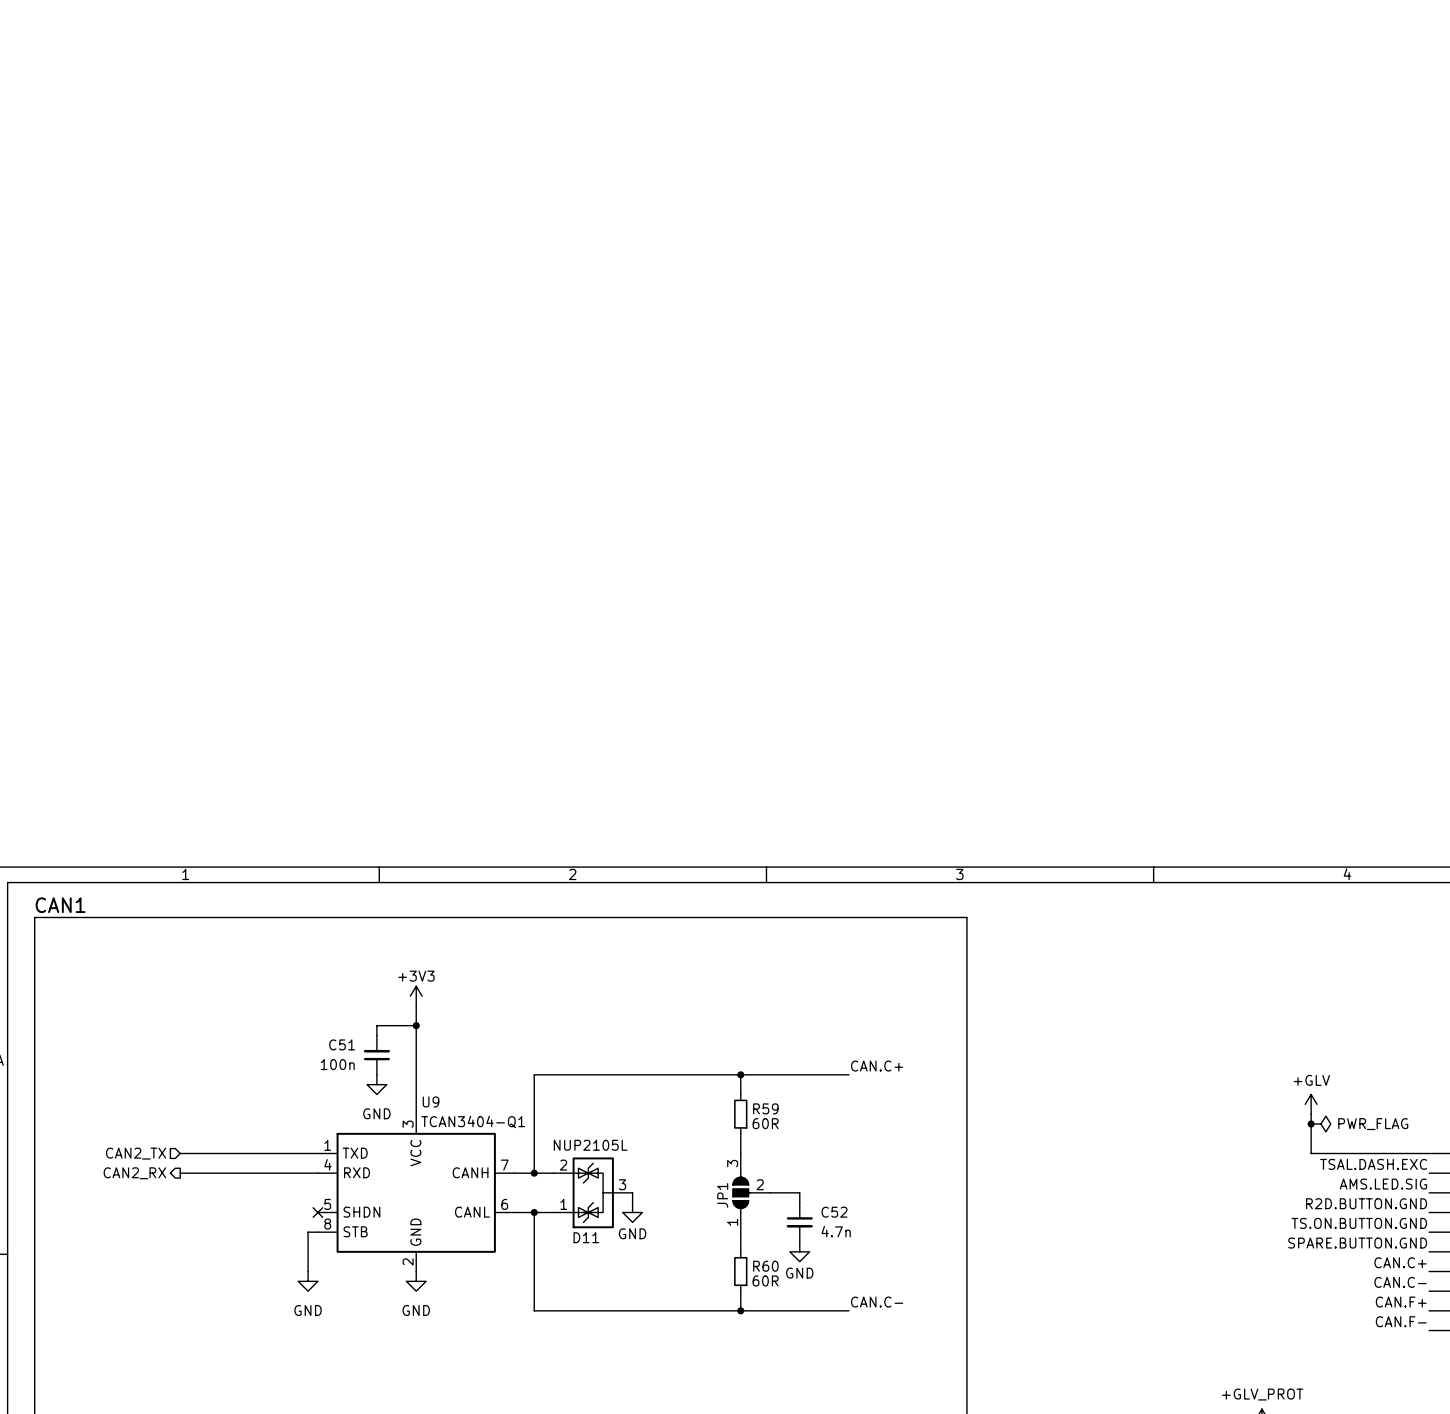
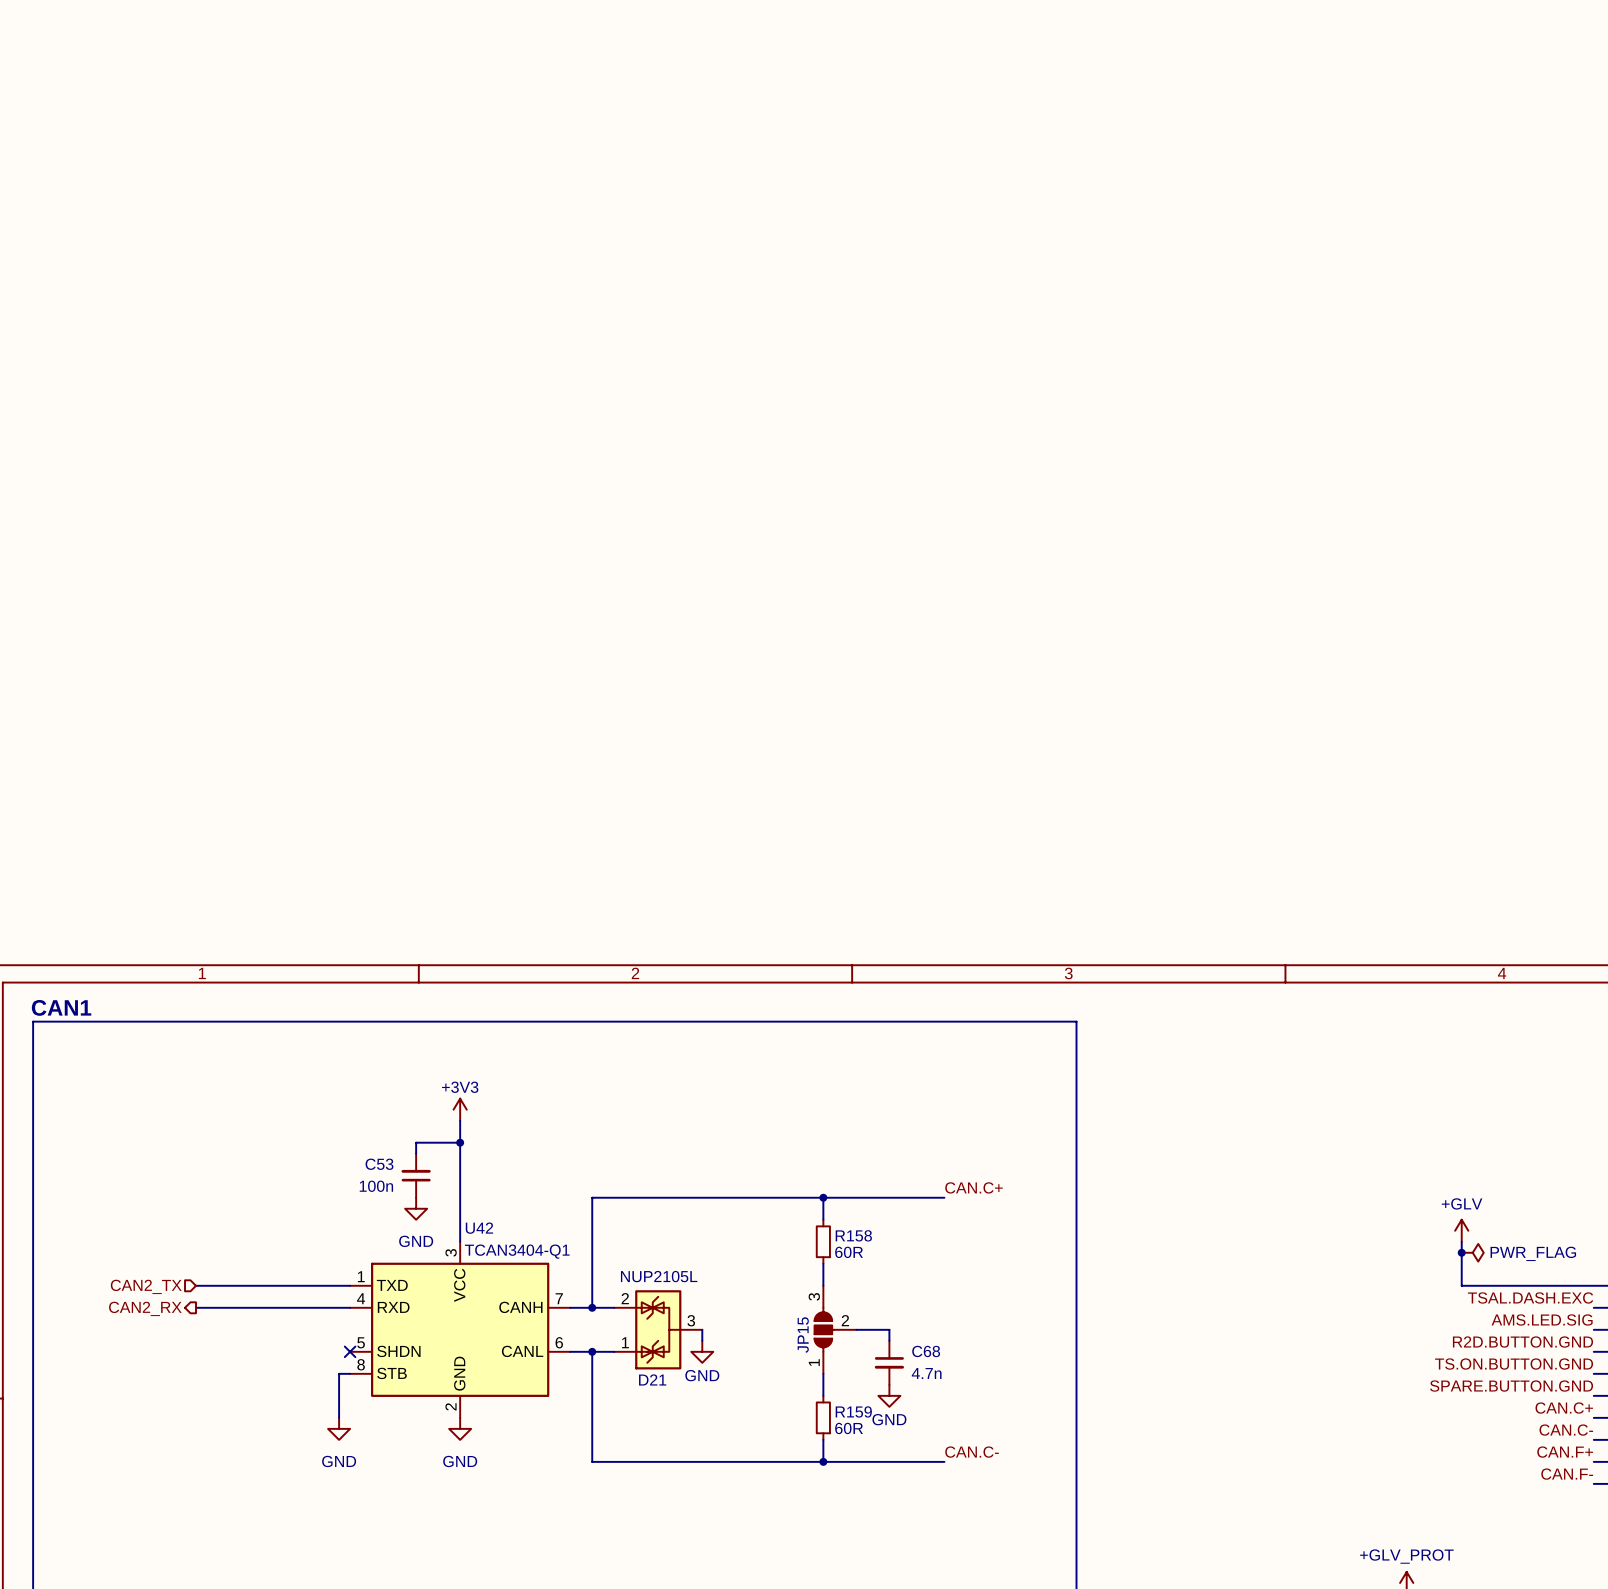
C51 name: C51 (342, 1044) -> C53 (379, 1164)
U9 name: U9 (431, 1102) -> U42 (479, 1228)
R59 name: R59 (765, 1108) -> R158 (853, 1235)
JP1 name: JP1 (722, 1195) -> JP15 (803, 1335)
C52 name: C52 (834, 1212) -> C68 (926, 1351)
D11 name: D11 (586, 1237) -> D21 (652, 1379)
R60 name: R60 (765, 1266) -> R159 (853, 1411)

